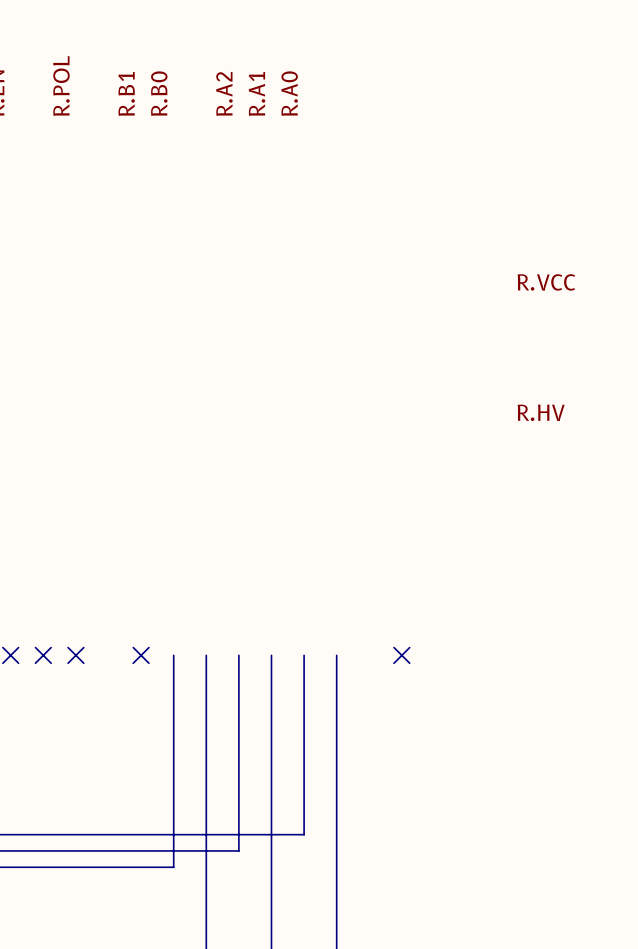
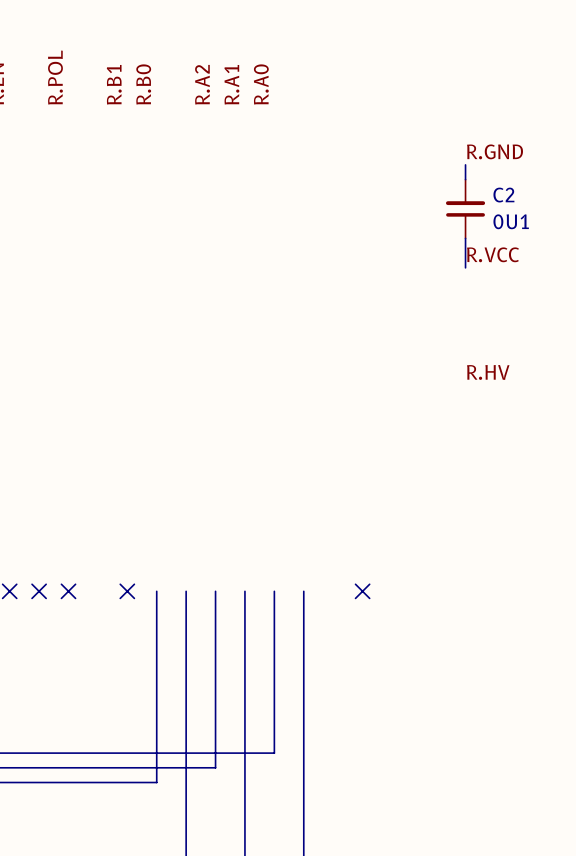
label: none -> R.GND (495, 151)
wire: none -> (465, 164) (465, 179)
C2: none -> 0U1 (465, 209)
wire: none -> (465, 238) (465, 267)

